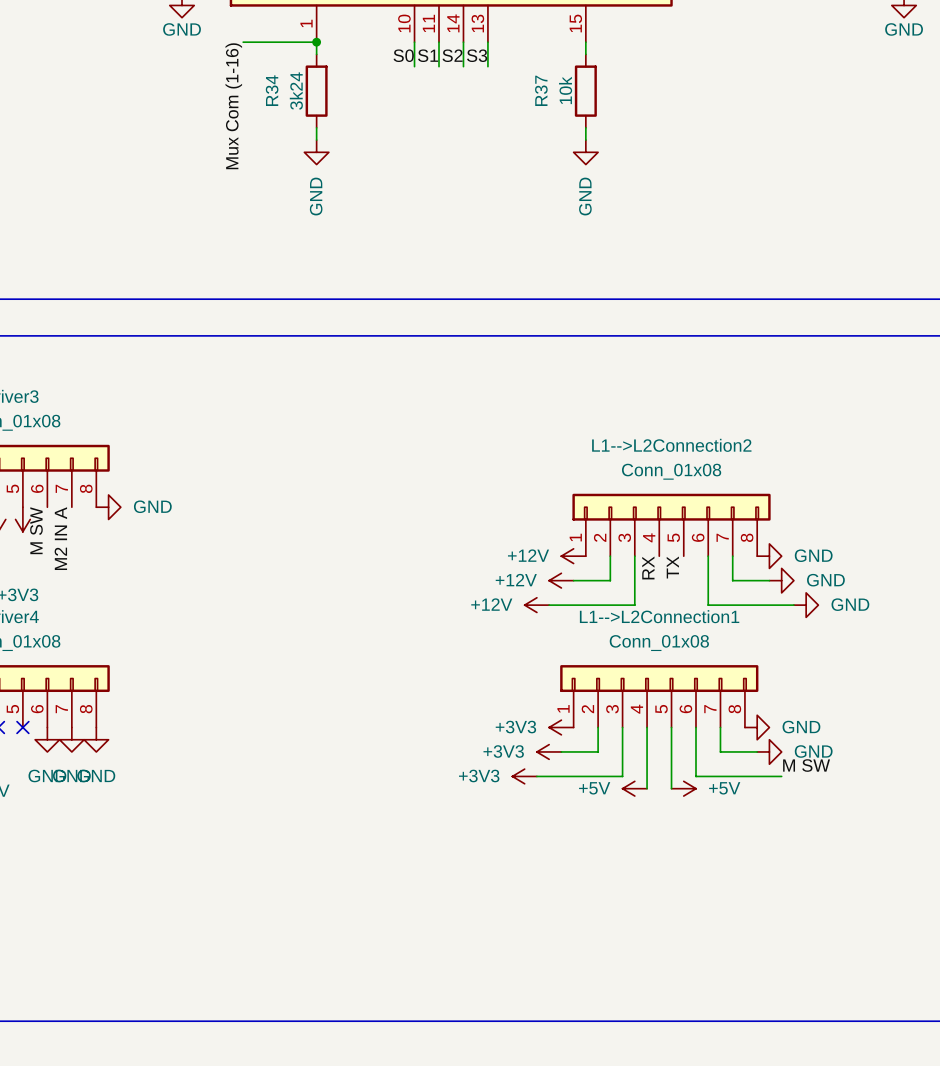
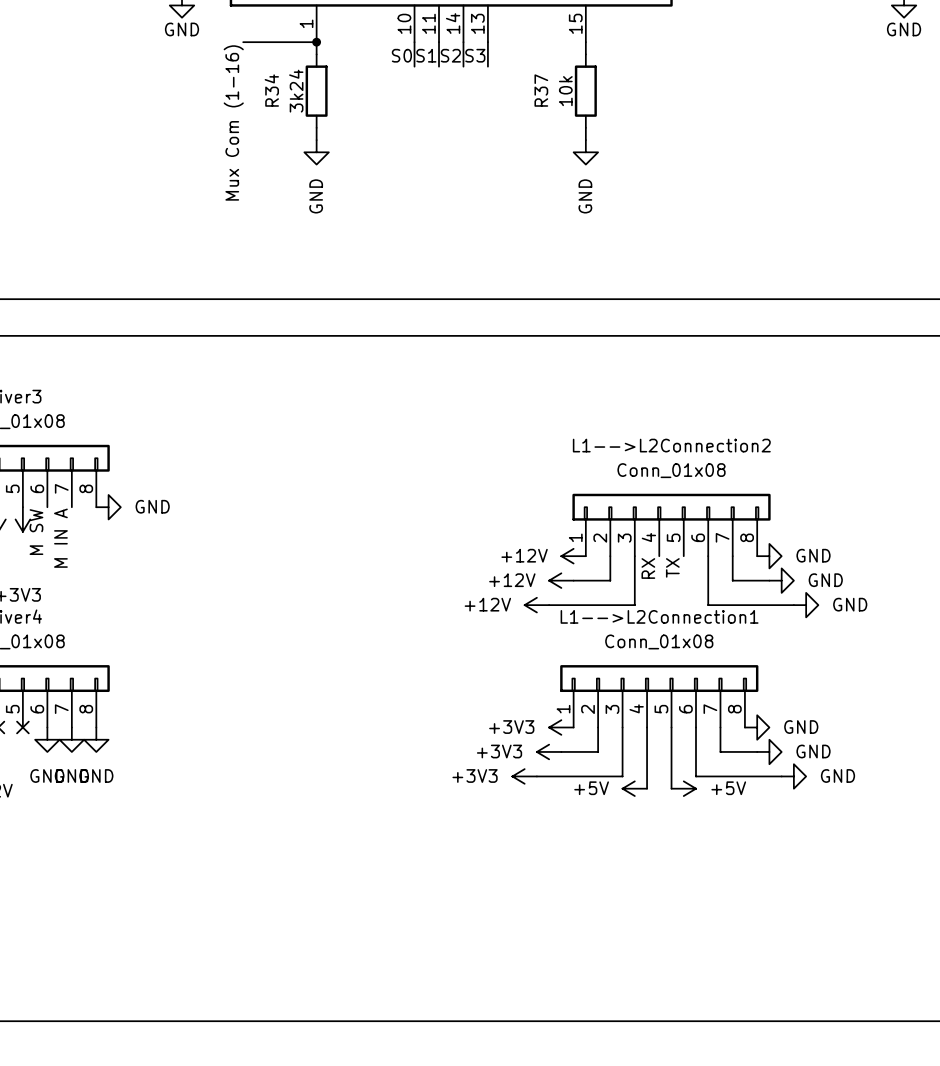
label: M2 IN A (60, 538) -> M IN A (60, 538)
label: M SW (806, 765) -> none
power symbol: none -> GND (793, 776)

